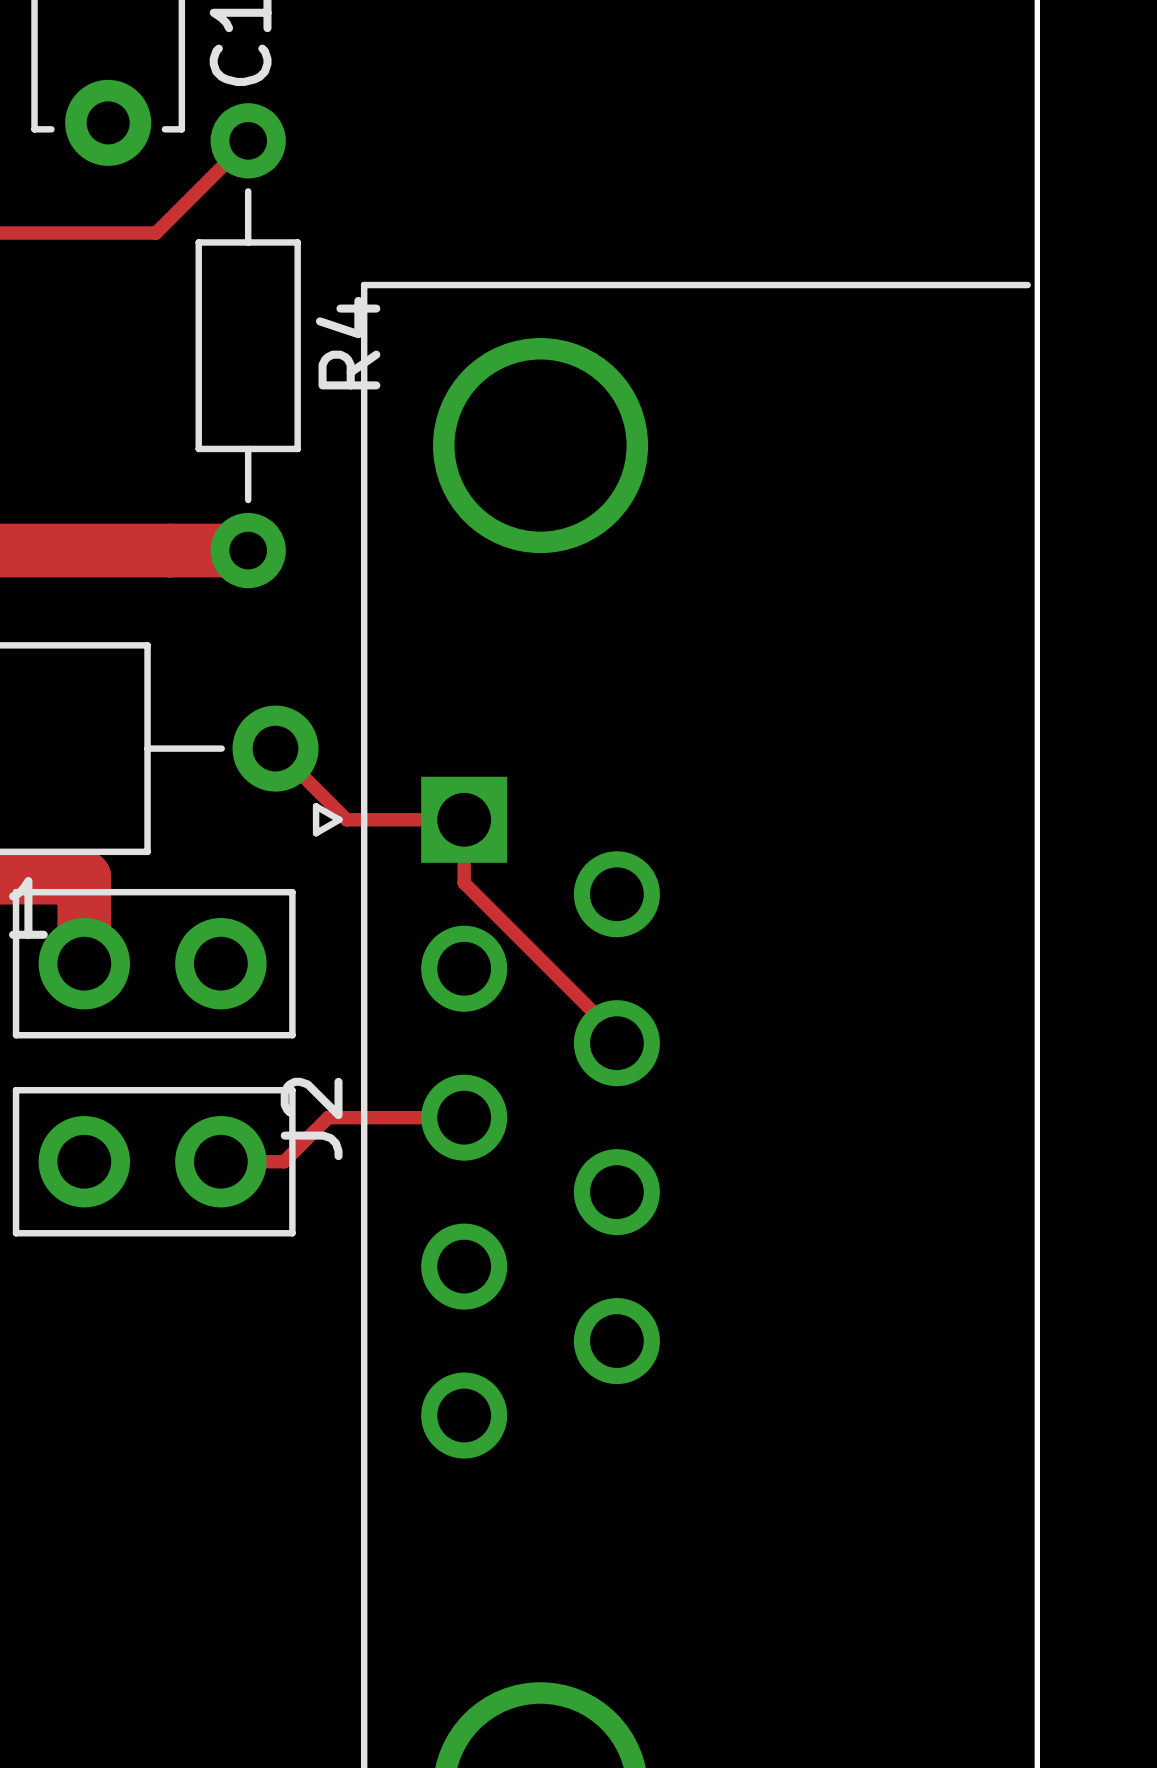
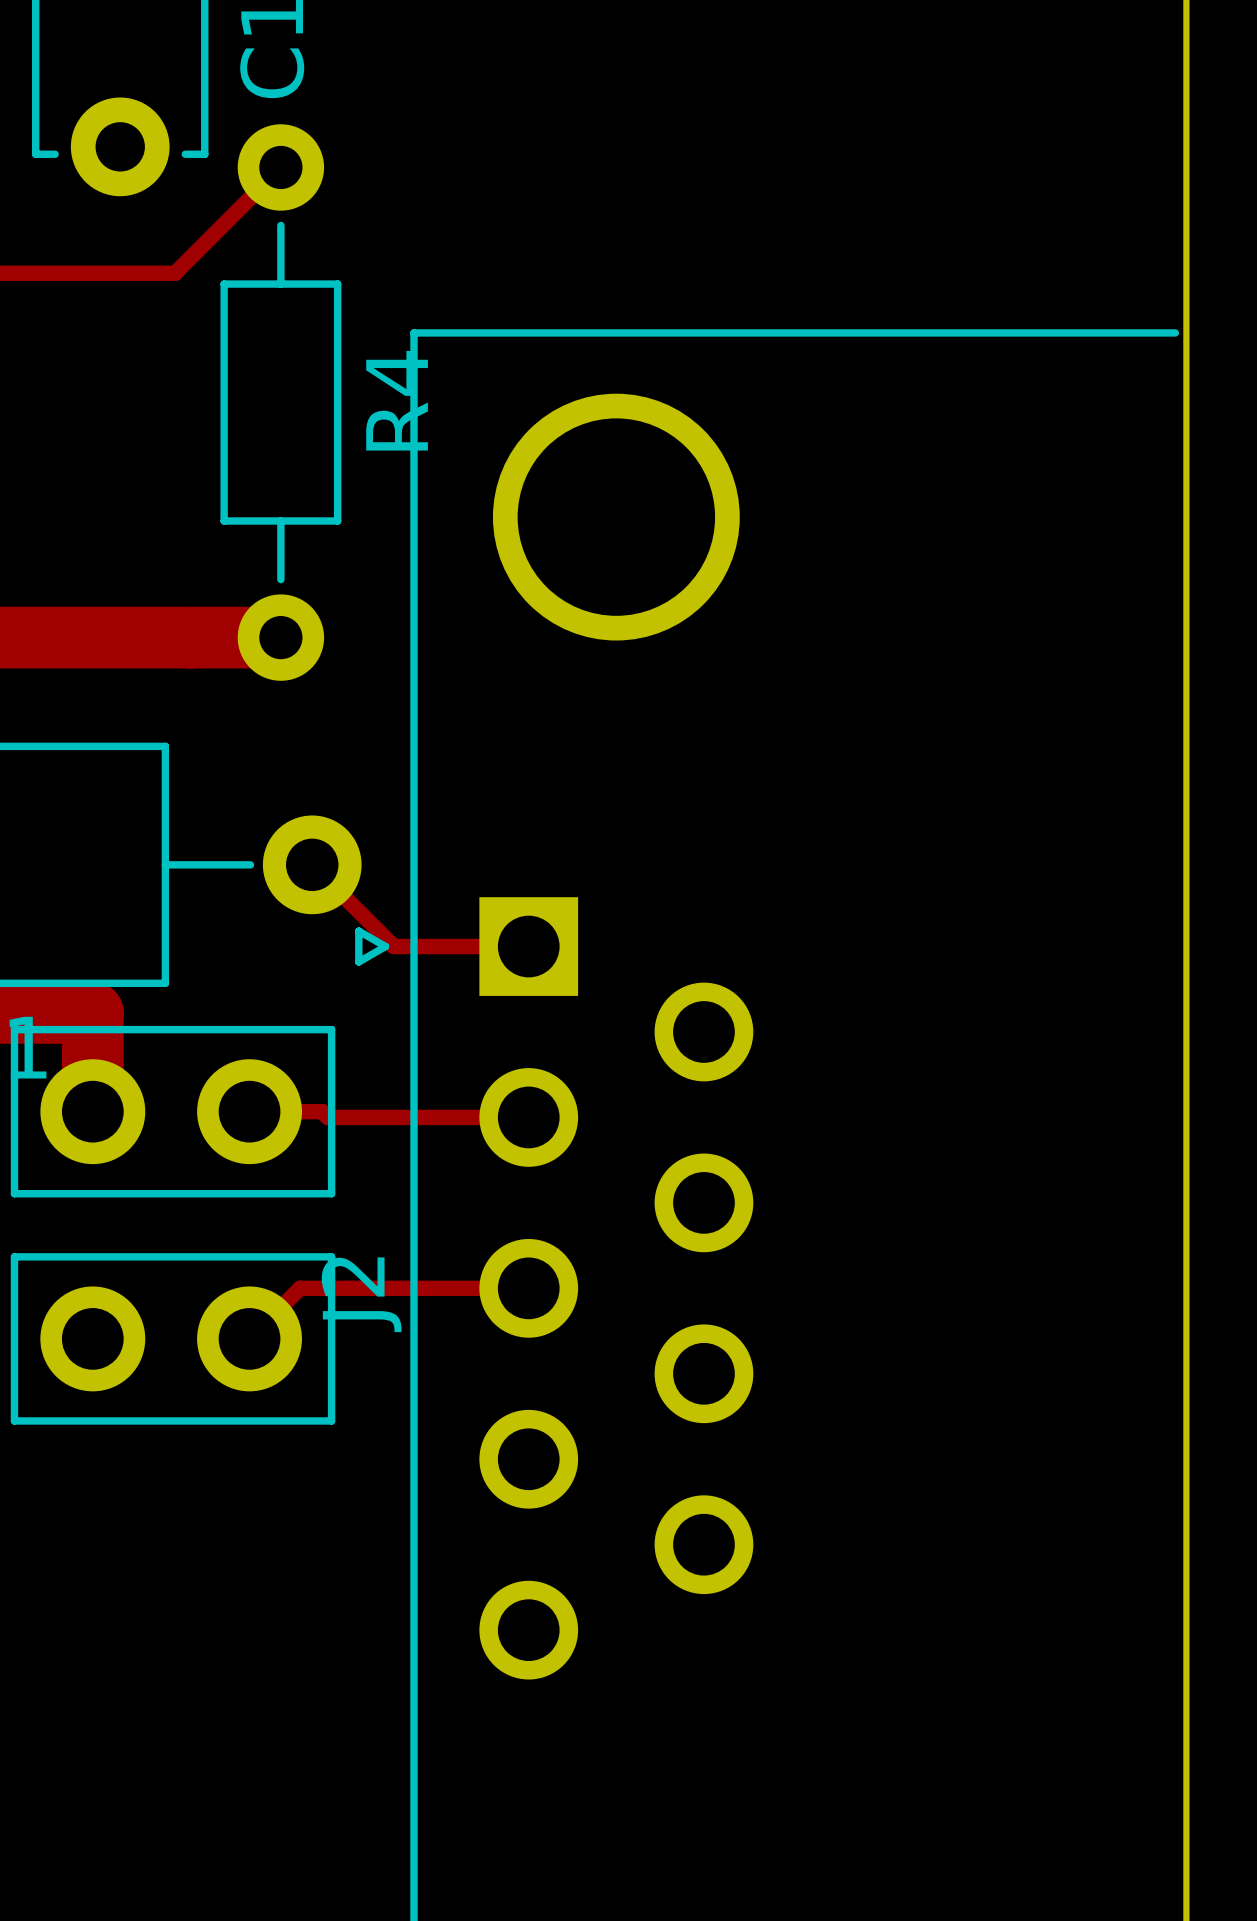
track: (464, 819) (464, 882) (616, 1035) (616, 1043) -> none
track: none -> (249, 1111) (322, 1111) (327, 1117) (528, 1117)
track: (328, 1117) (284, 1161) (220, 1161) -> (372, 1288) (300, 1288) (249, 1338)

